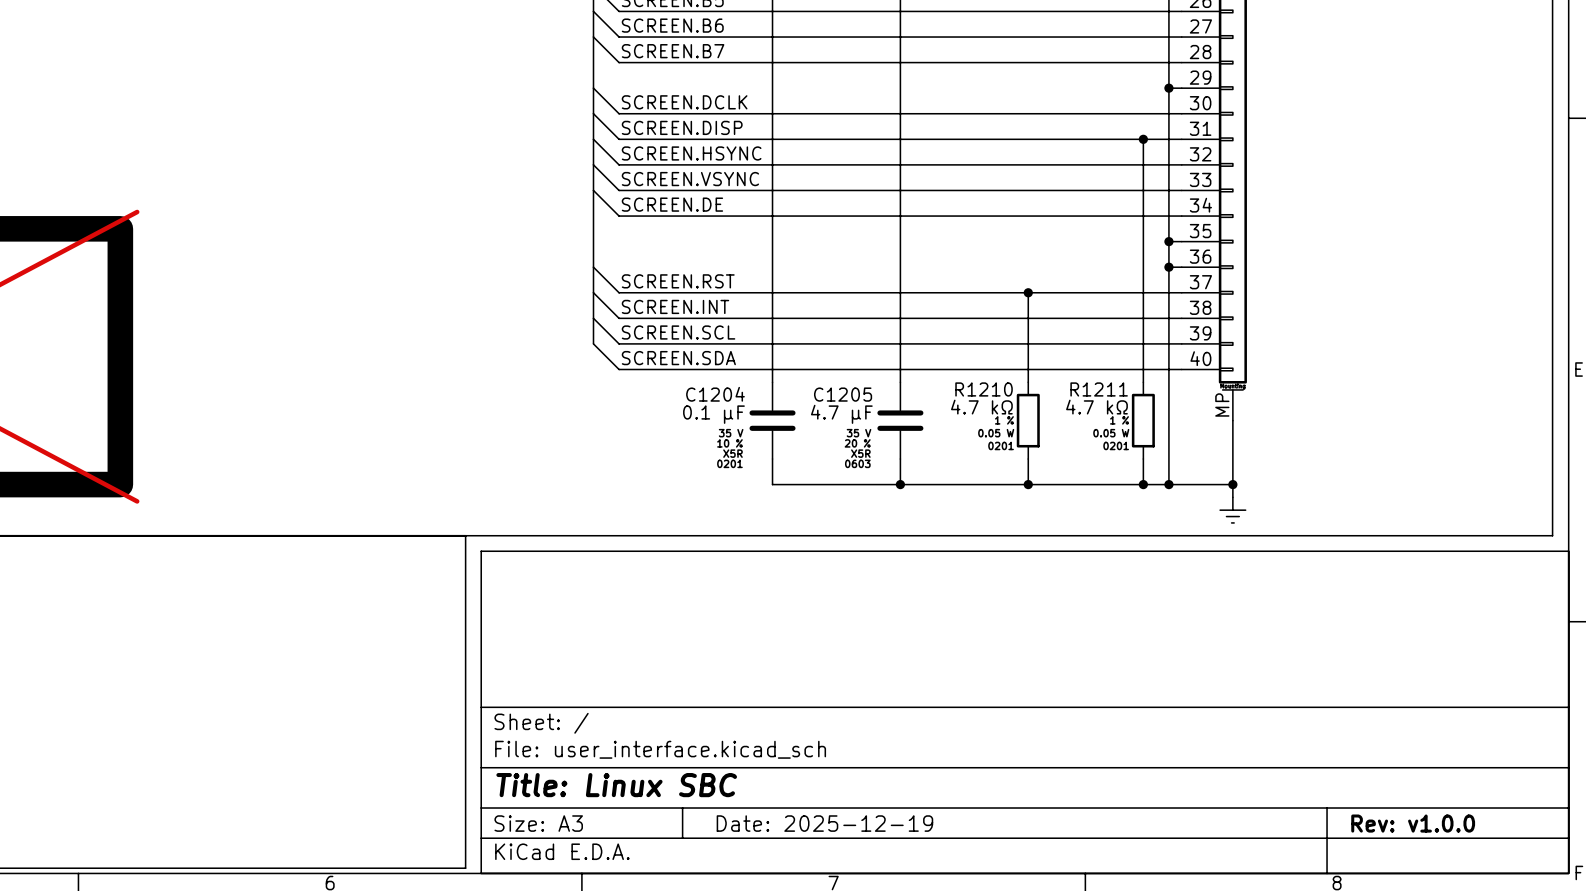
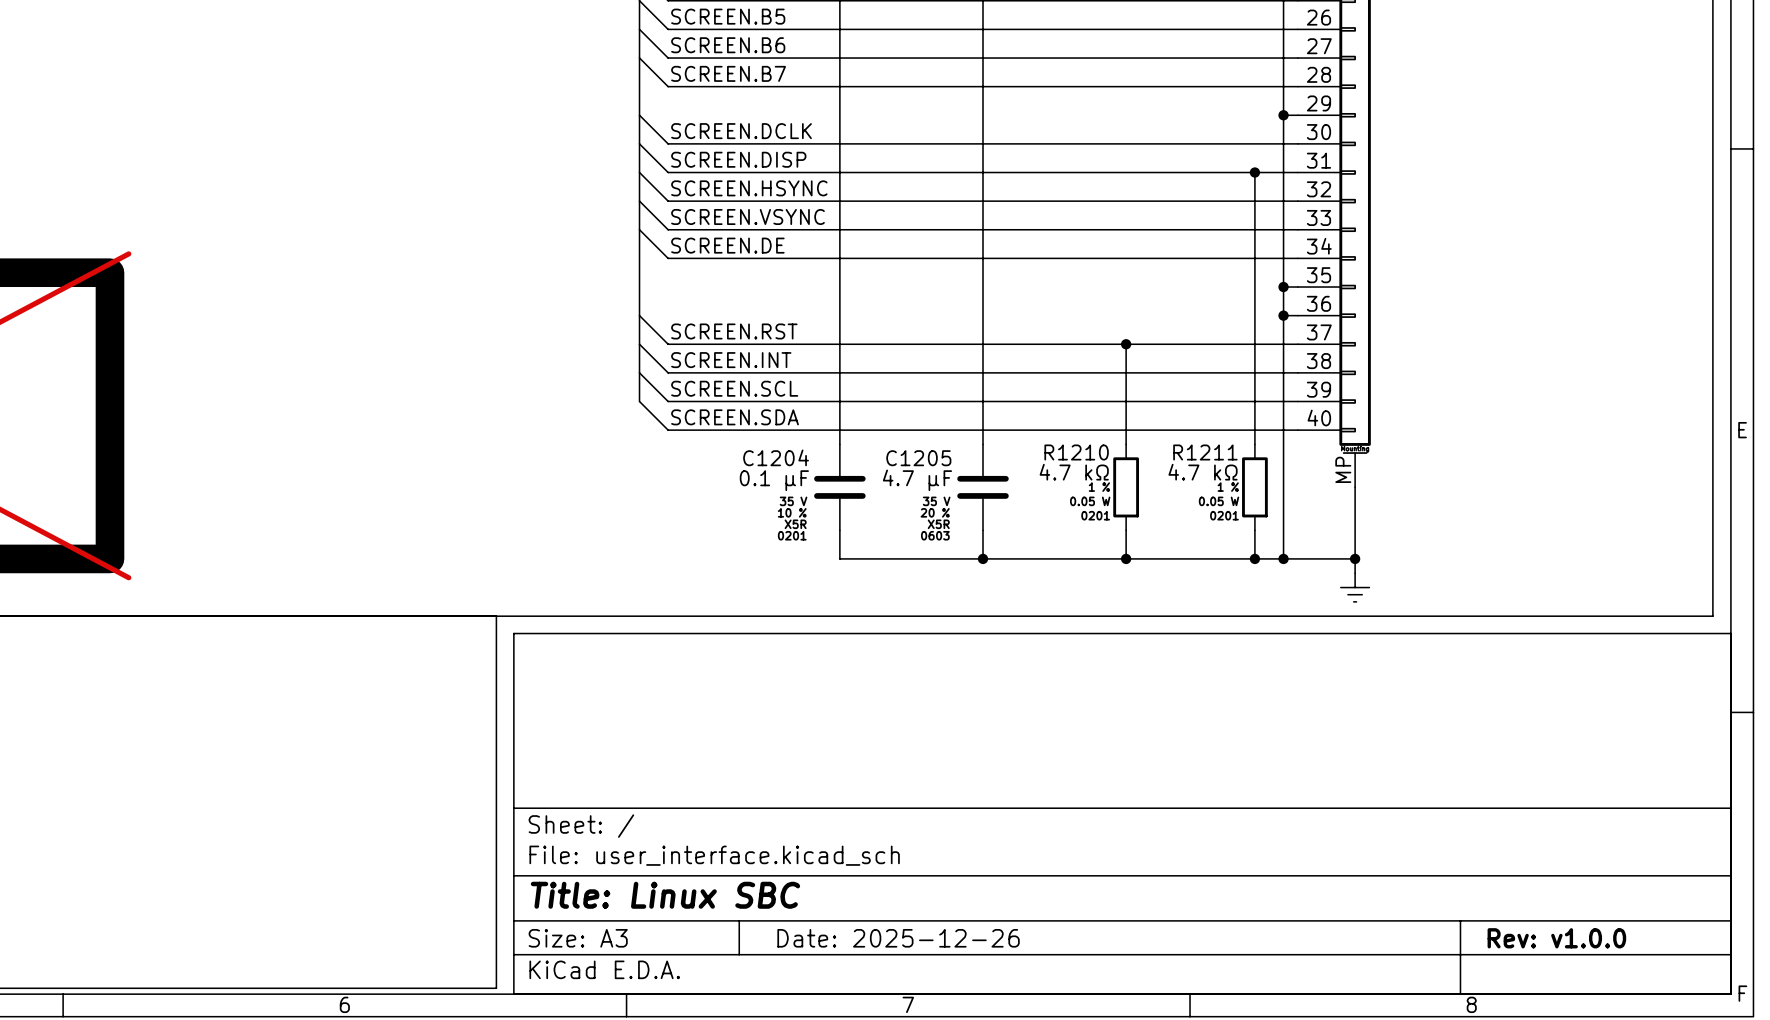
title block: Date: 2025-12-19 (824, 823) -> Date: 2025-12-26 (898, 938)

